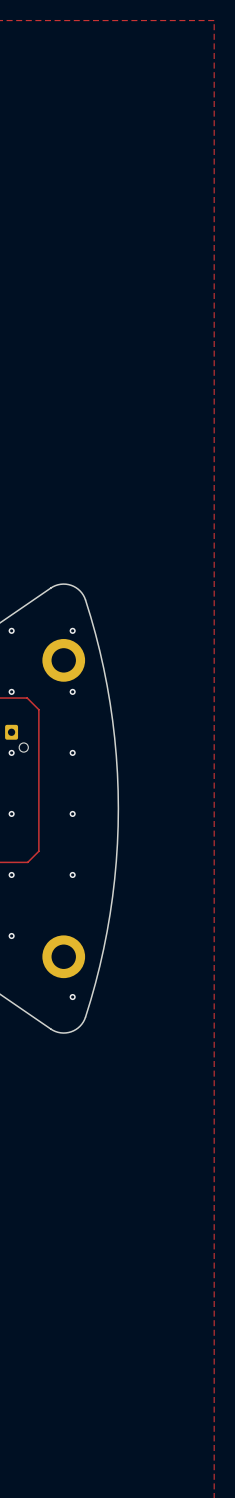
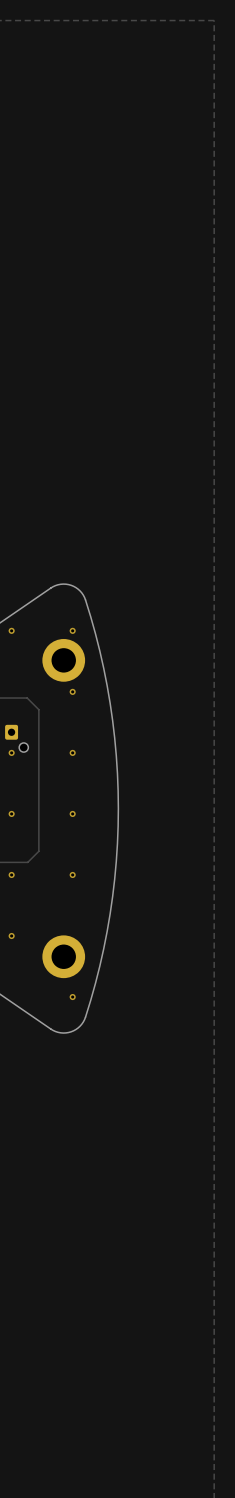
via: (11, 691) -> none

